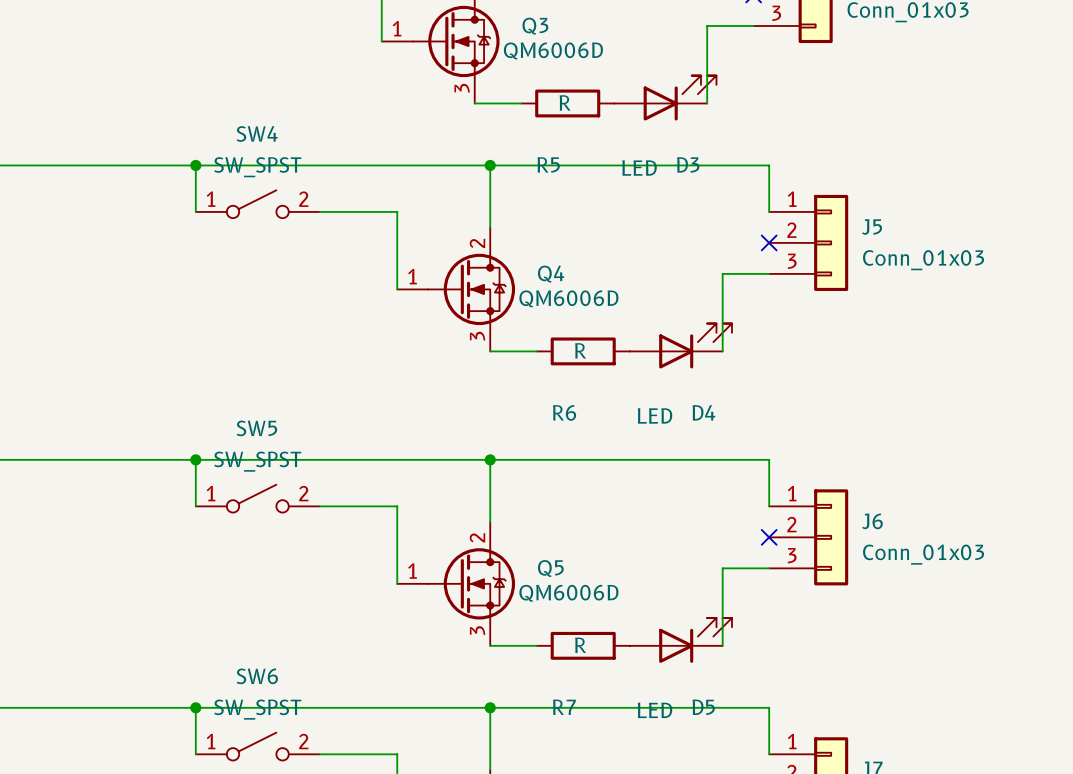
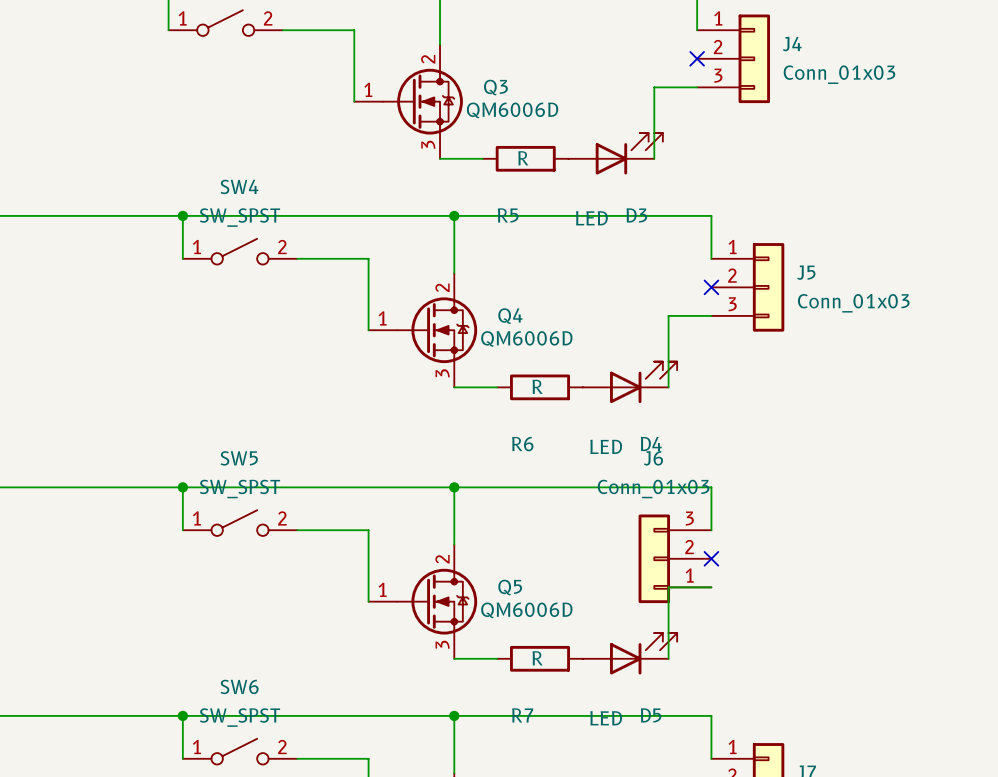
J6 name position: J6 (872, 521) -> J6 (653, 458)
J6 position: (808, 537) -> (675, 558)
J6 rotation: 0° (831, 537) -> 180° (654, 558)
J6 value position: Conn_01x03 (923, 554) -> Conn_01x03 (653, 488)

